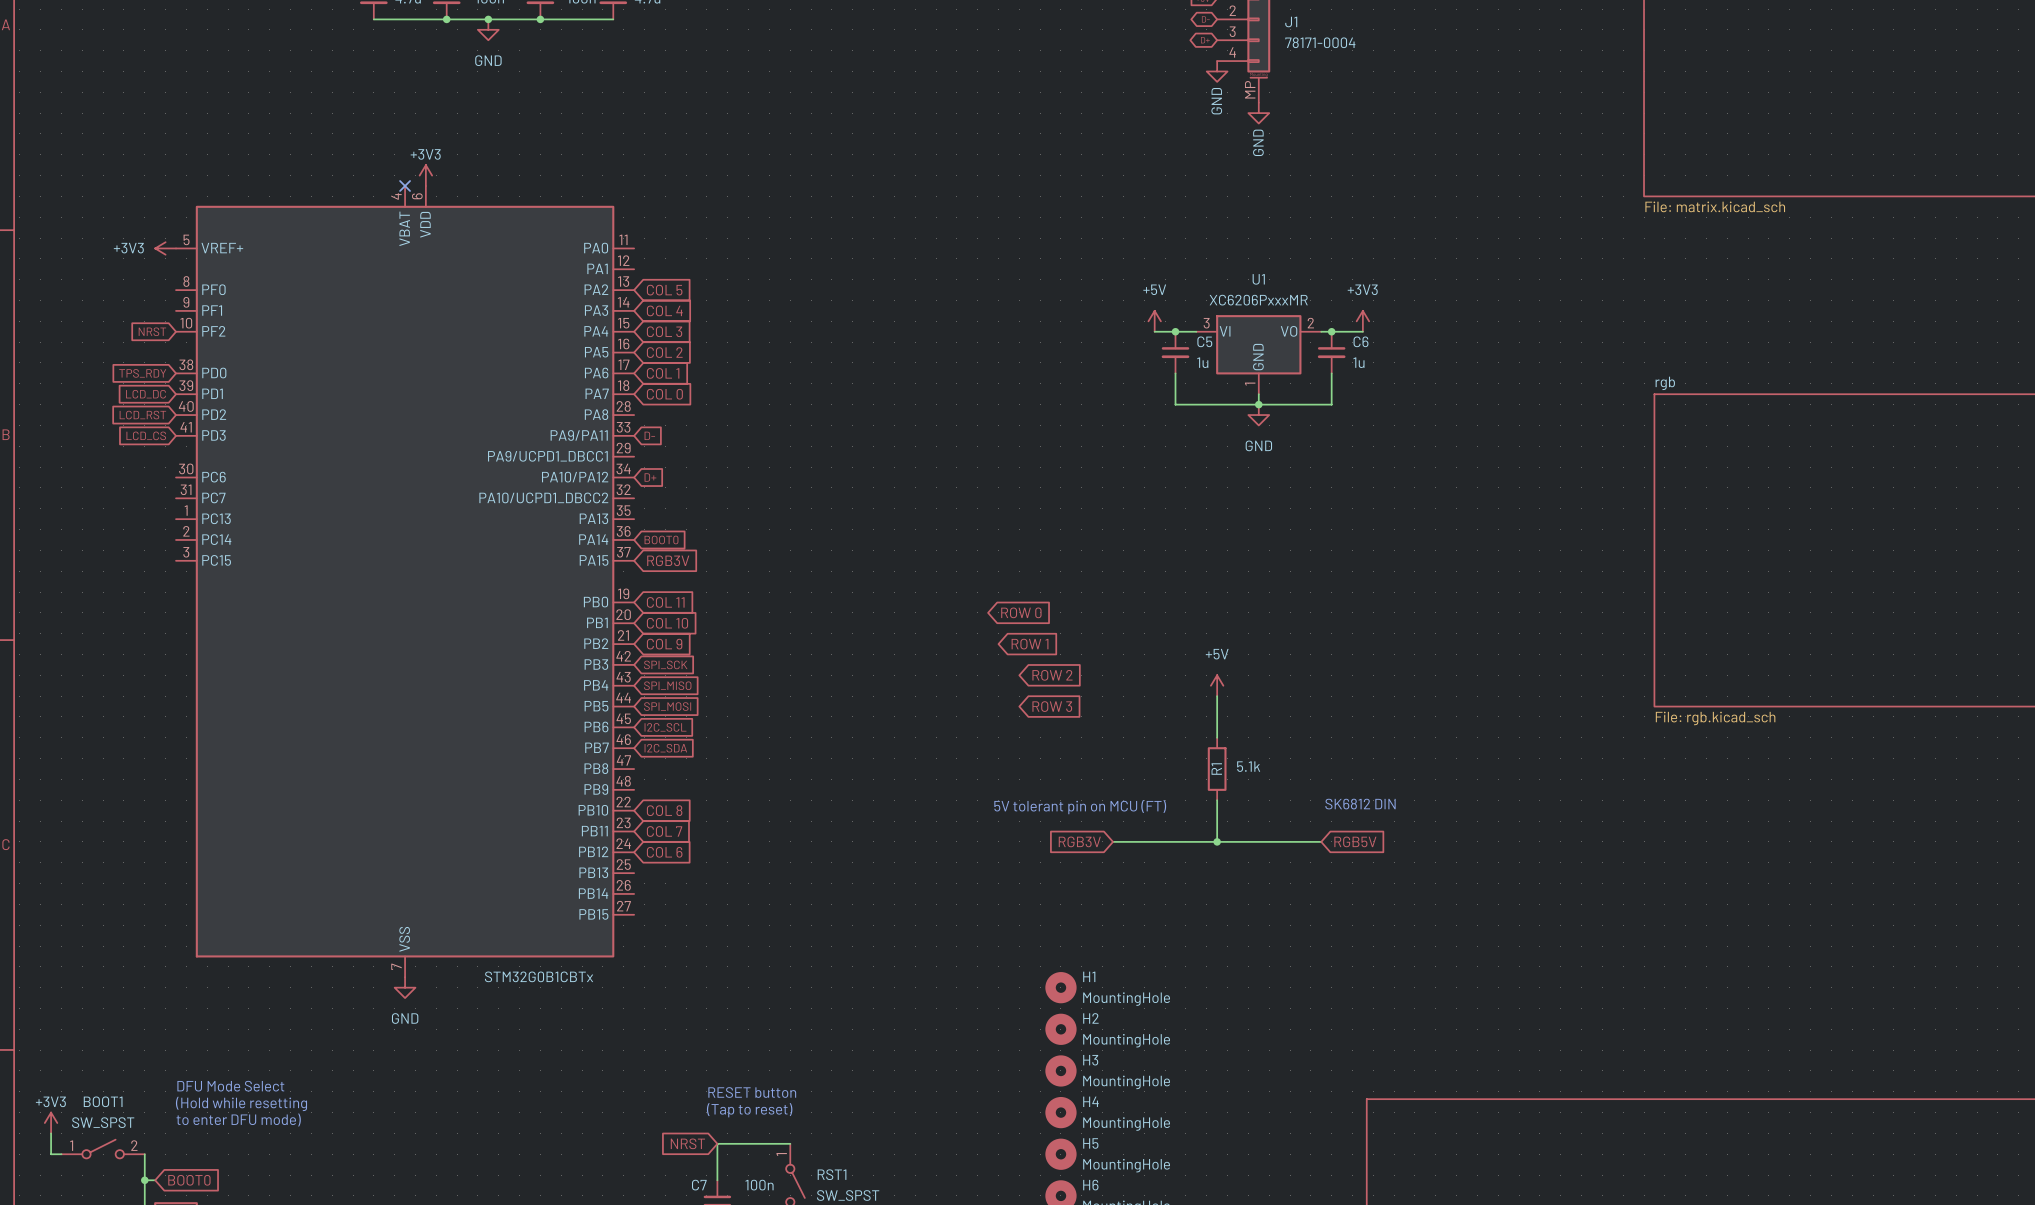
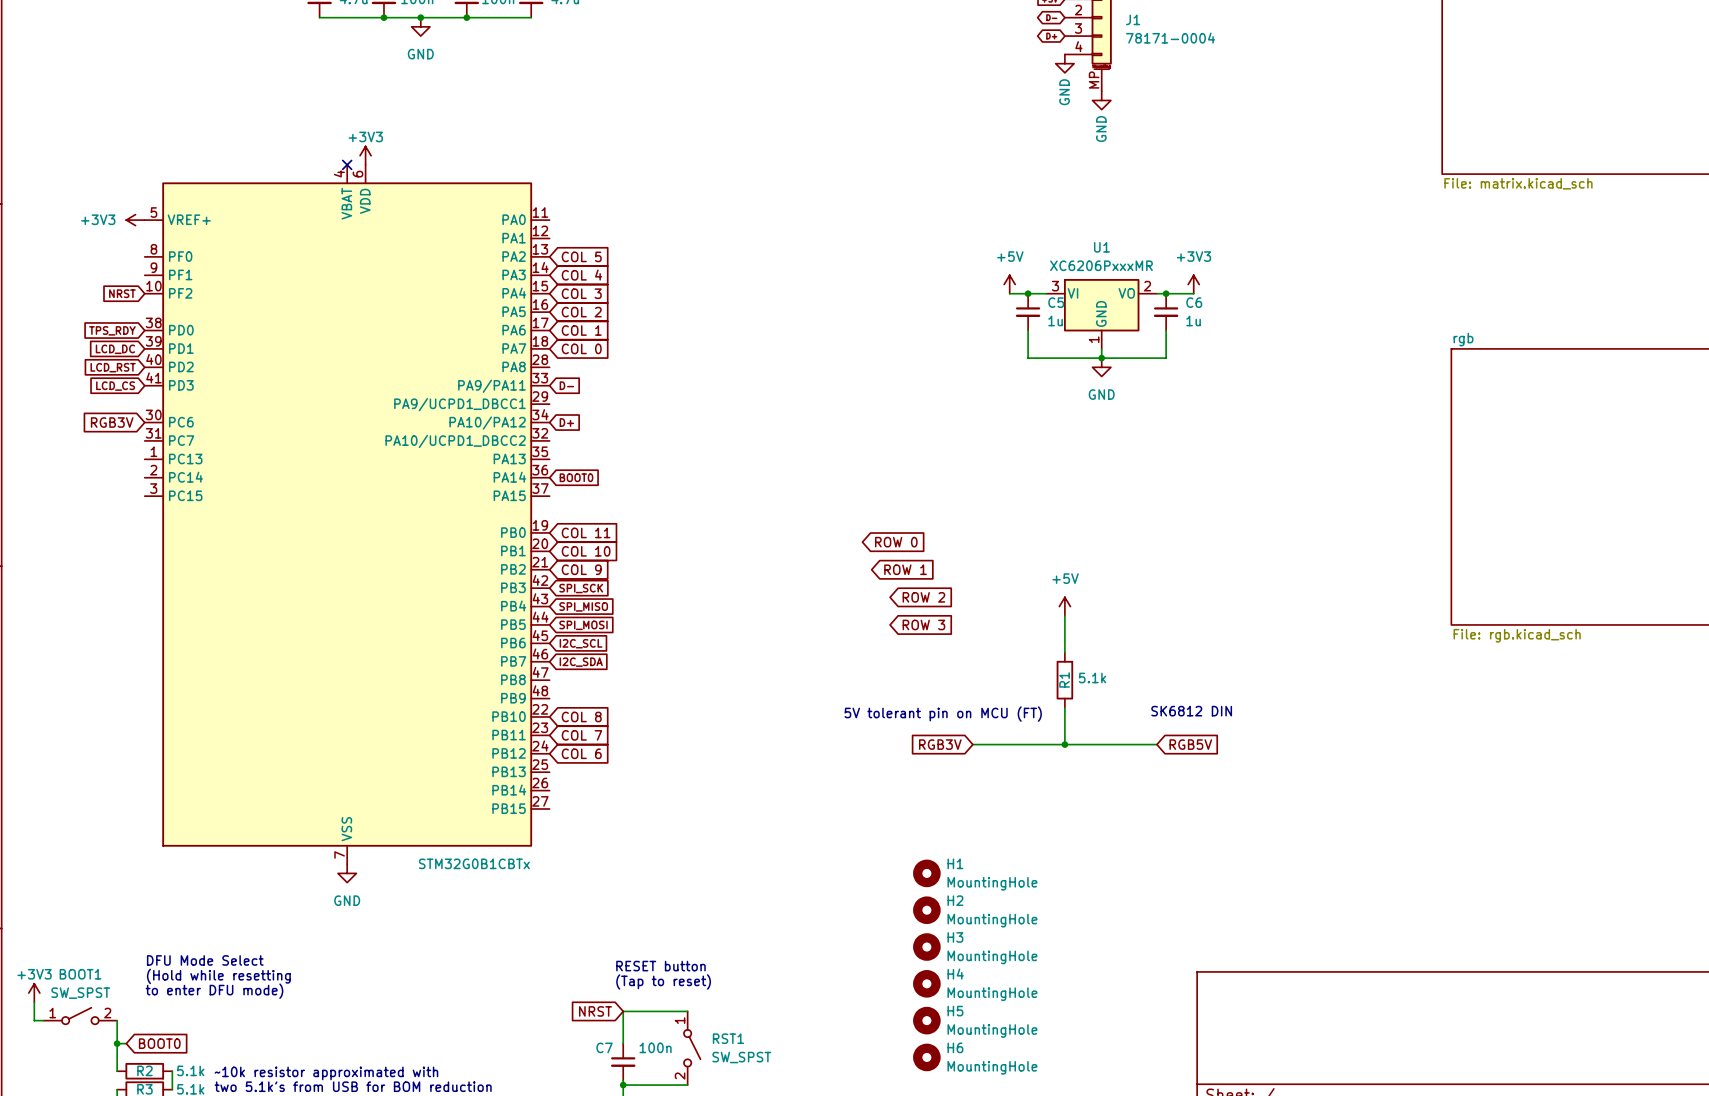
global label: none -> RGB3V (112, 422)
global label: RGB3V (668, 560) -> none

